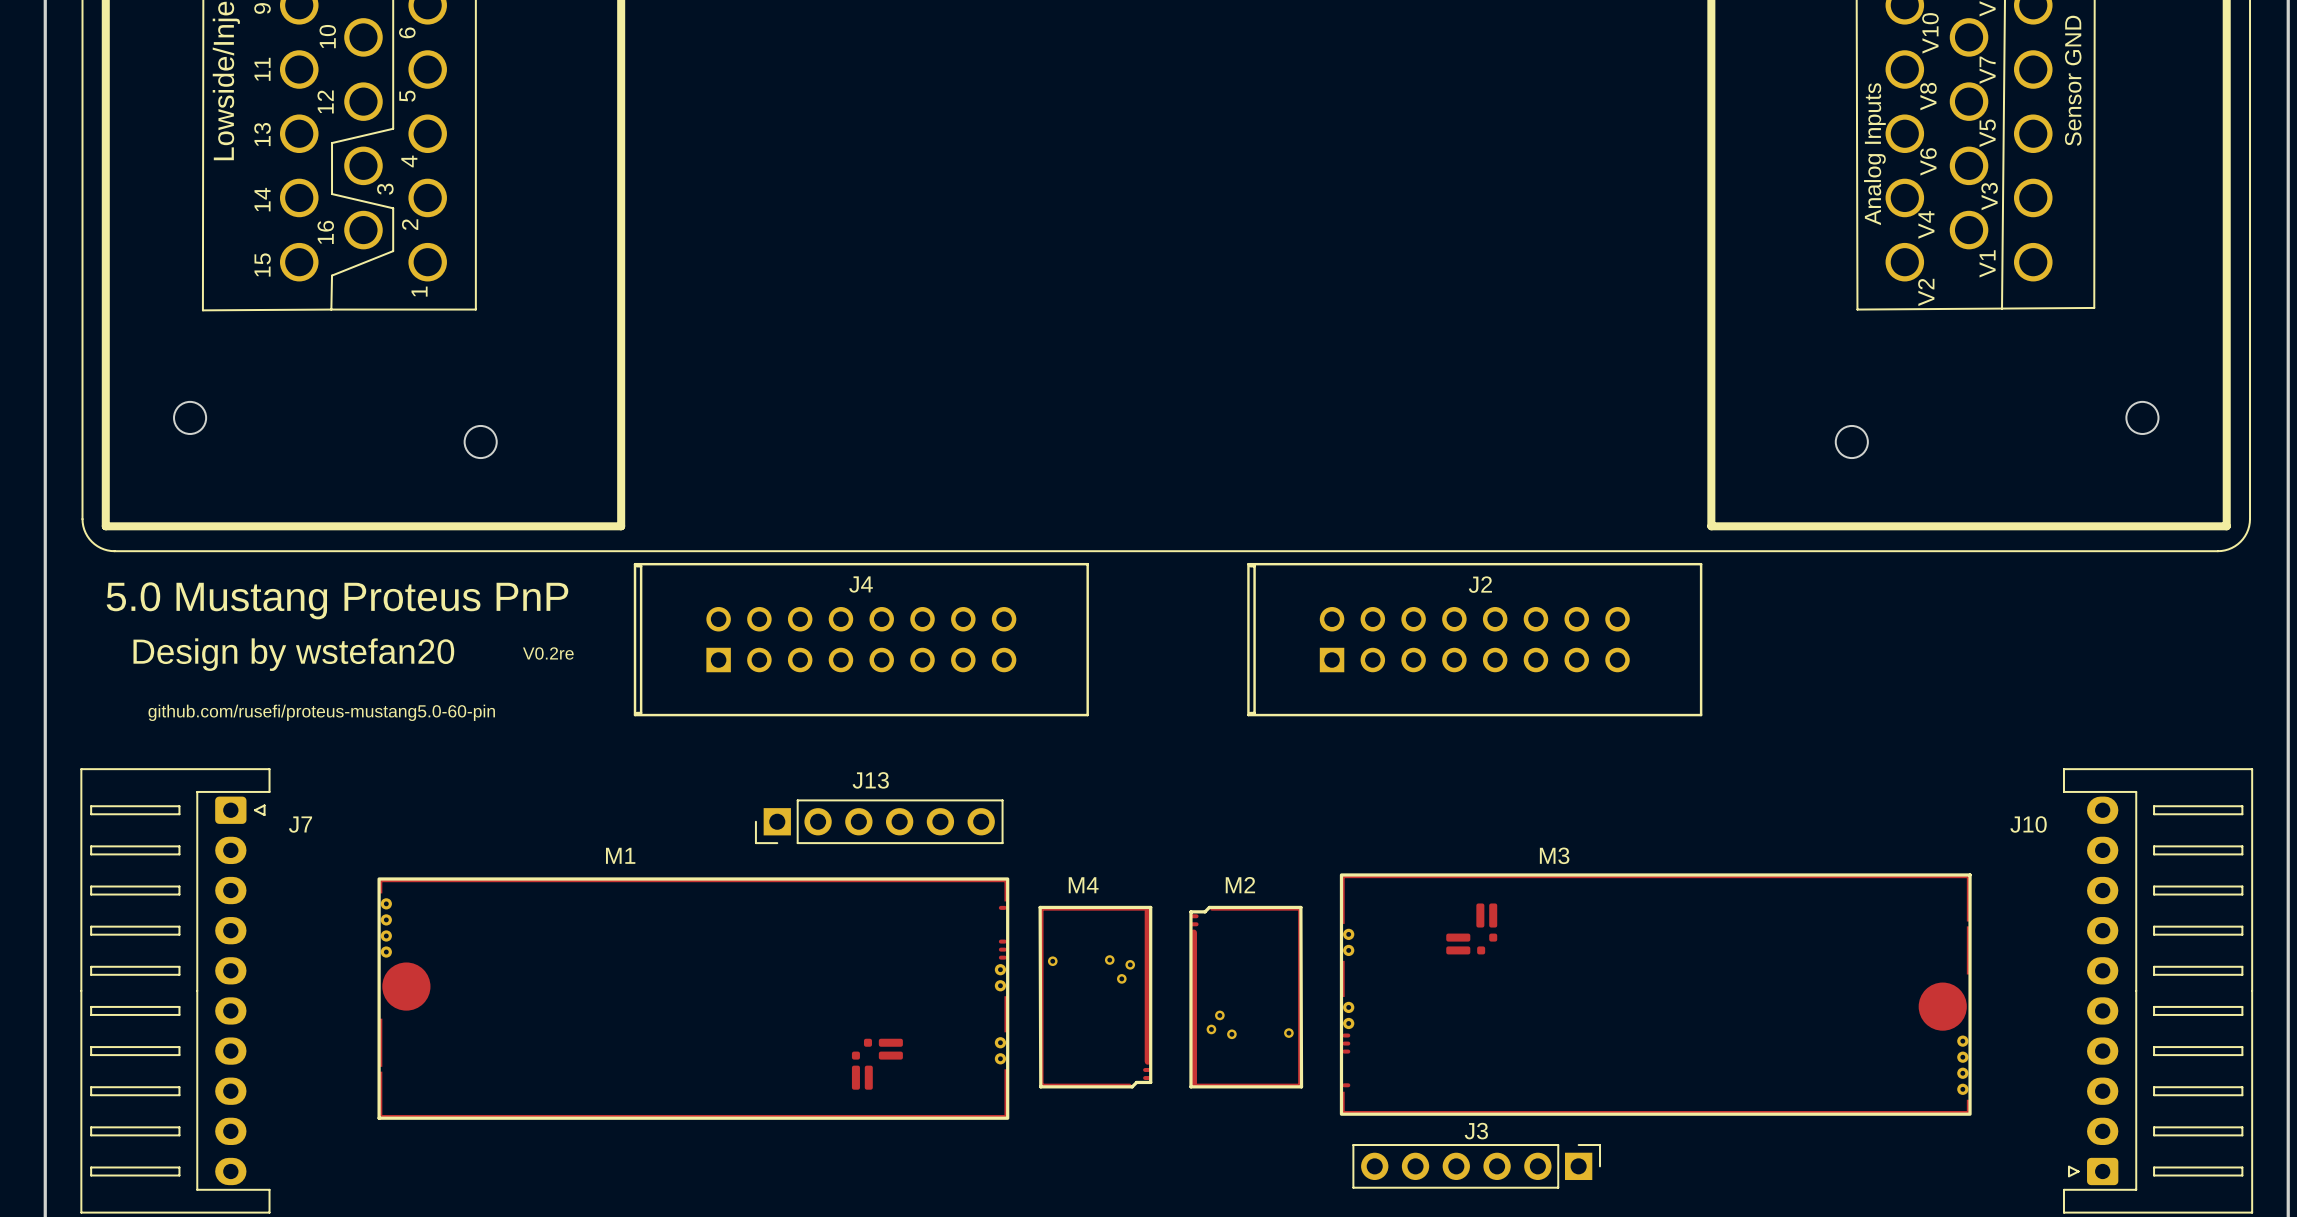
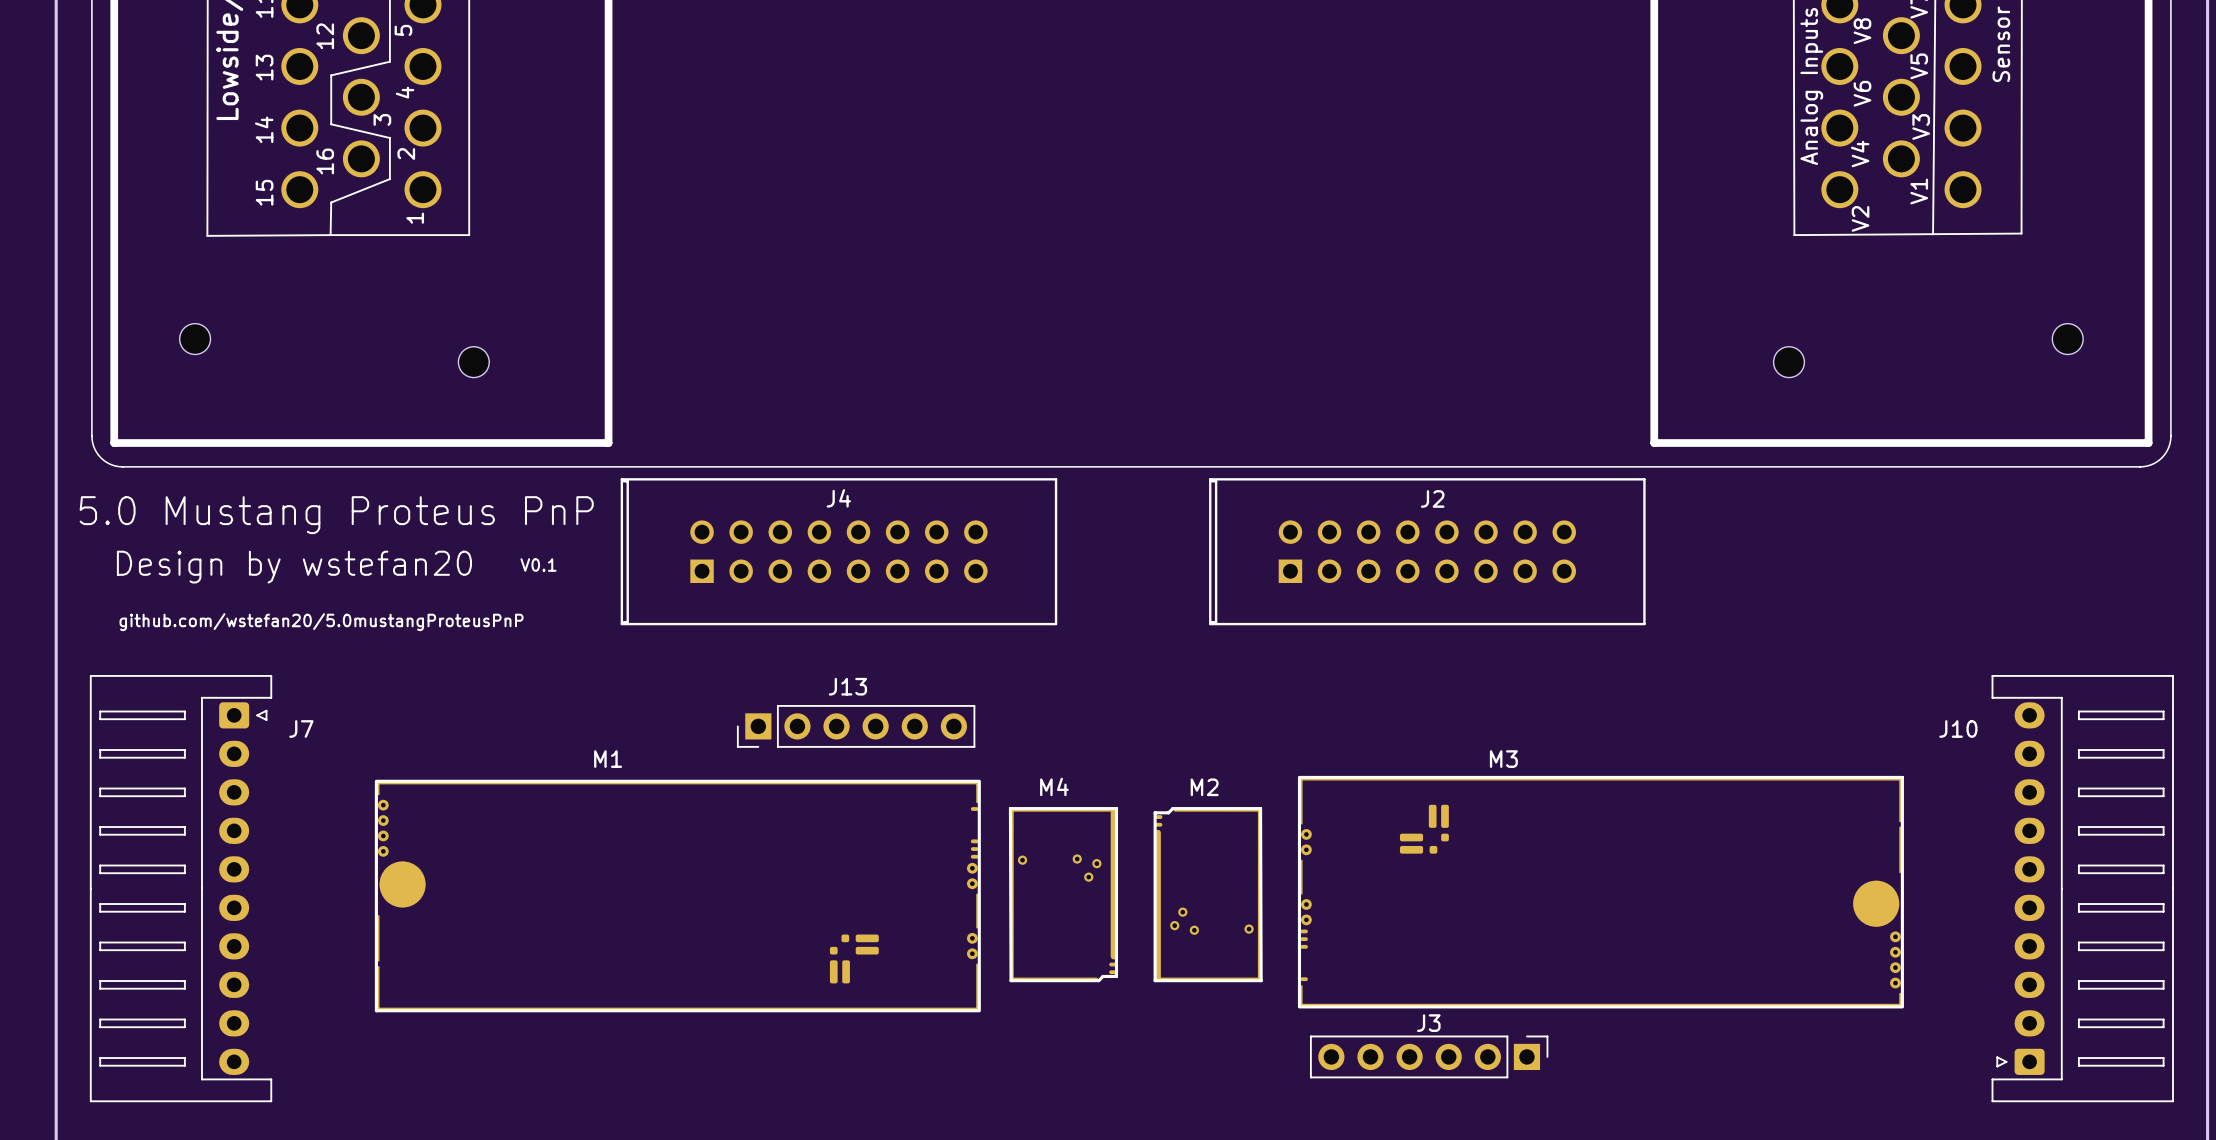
text: V0.2re (548, 653) -> V0.1 (538, 565)
text: github.com/rusefi/proteus-mustang5.0-60-pin (321, 712) -> github.com/wstefan20/5.0mustangProteusPnP (321, 622)

